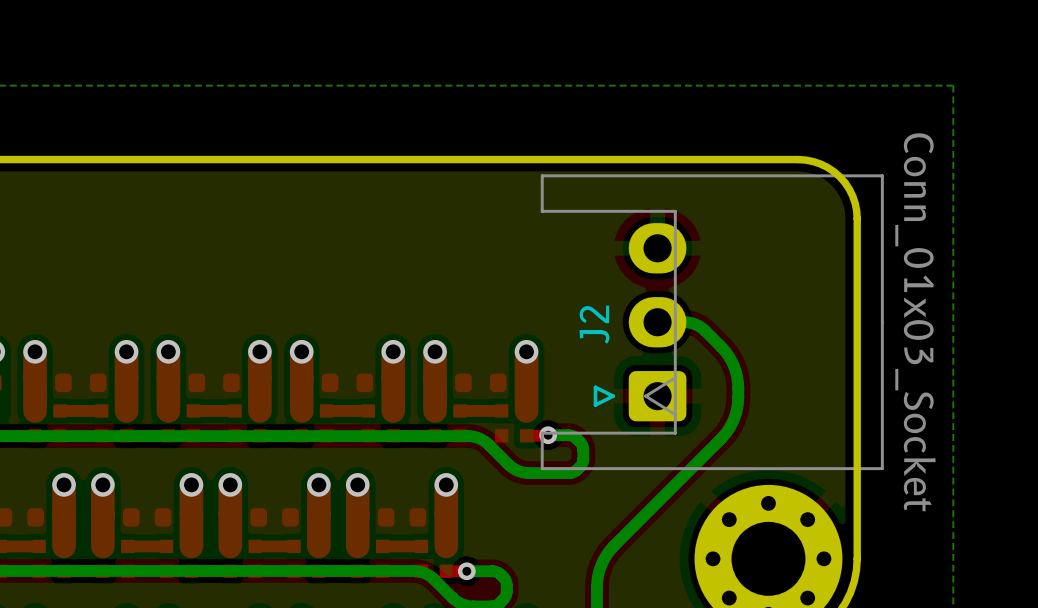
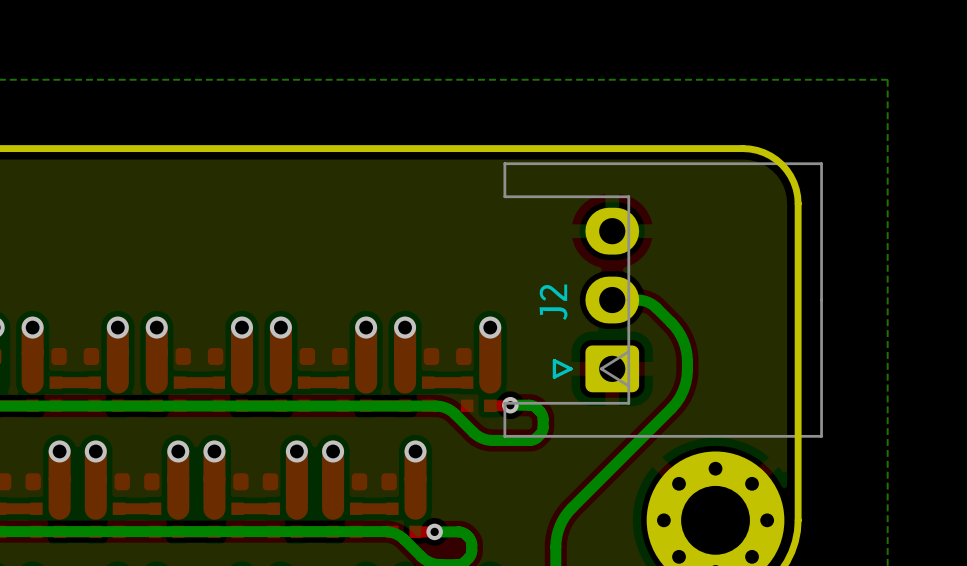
J2 value: Conn_01x03_Socket (915, 322) -> none

